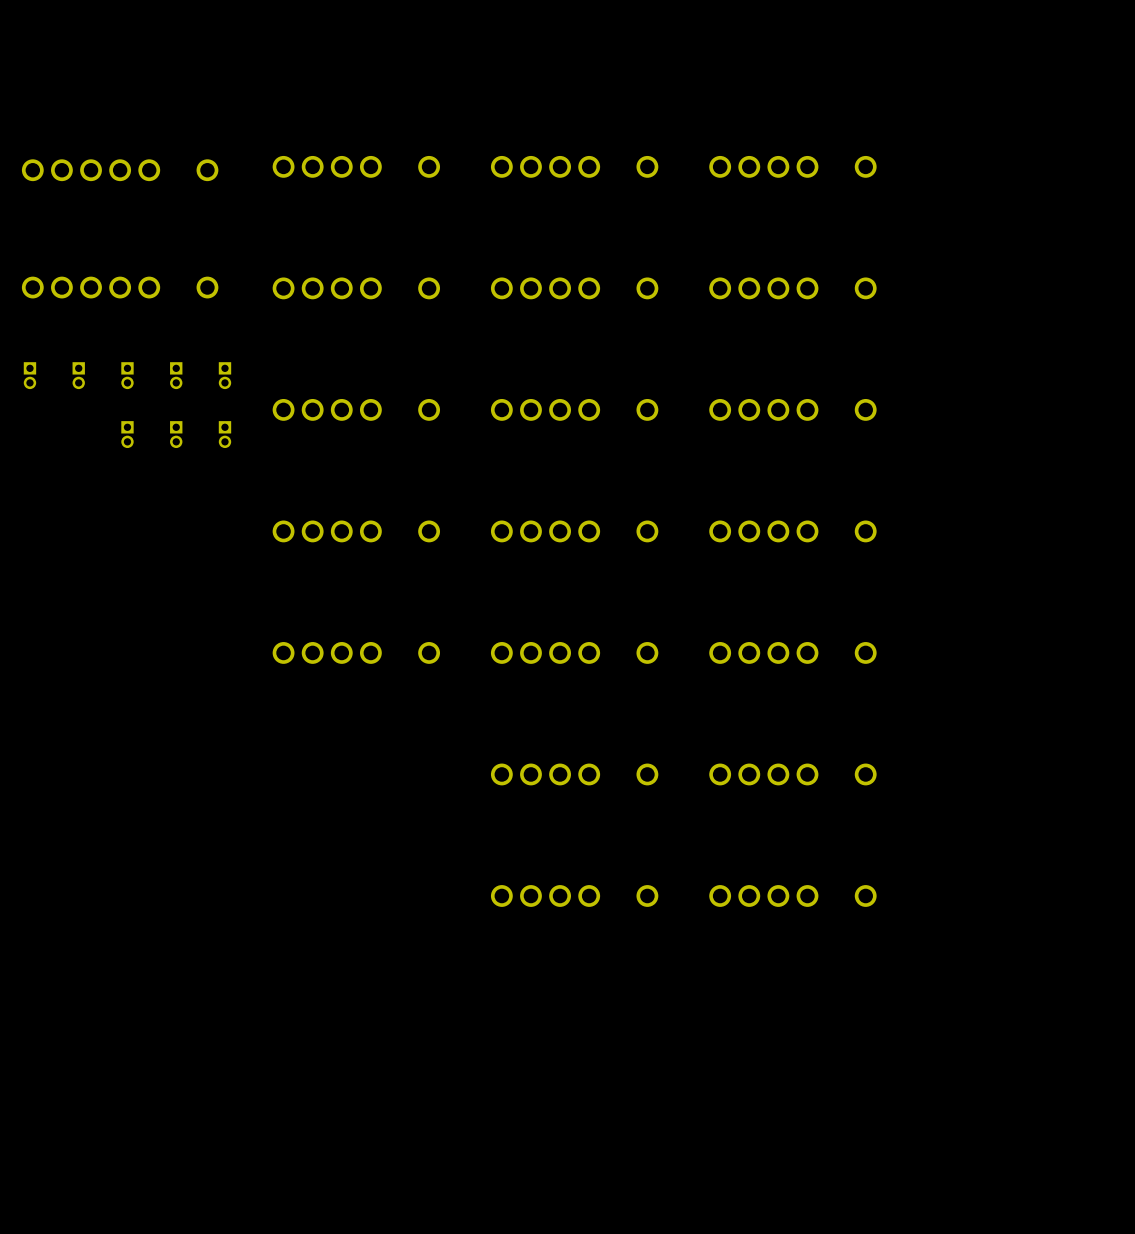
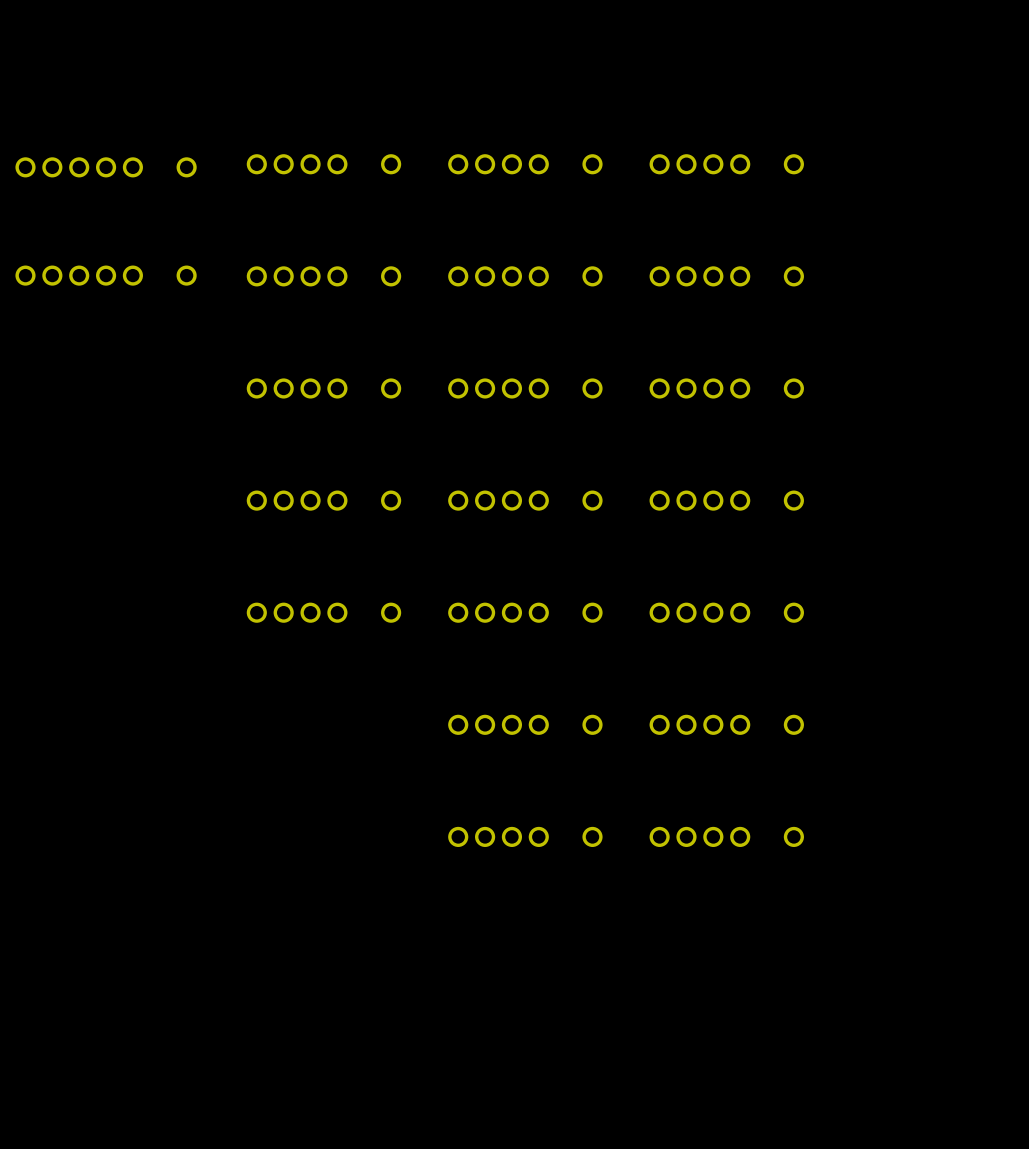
part: (29, 375) -> none
part: (78, 375) -> none
part: (127, 375) -> none
part: (176, 375) -> none
part: (224, 375) -> none
part: (127, 434) -> none
part: (176, 434) -> none
part: (224, 434) -> none

